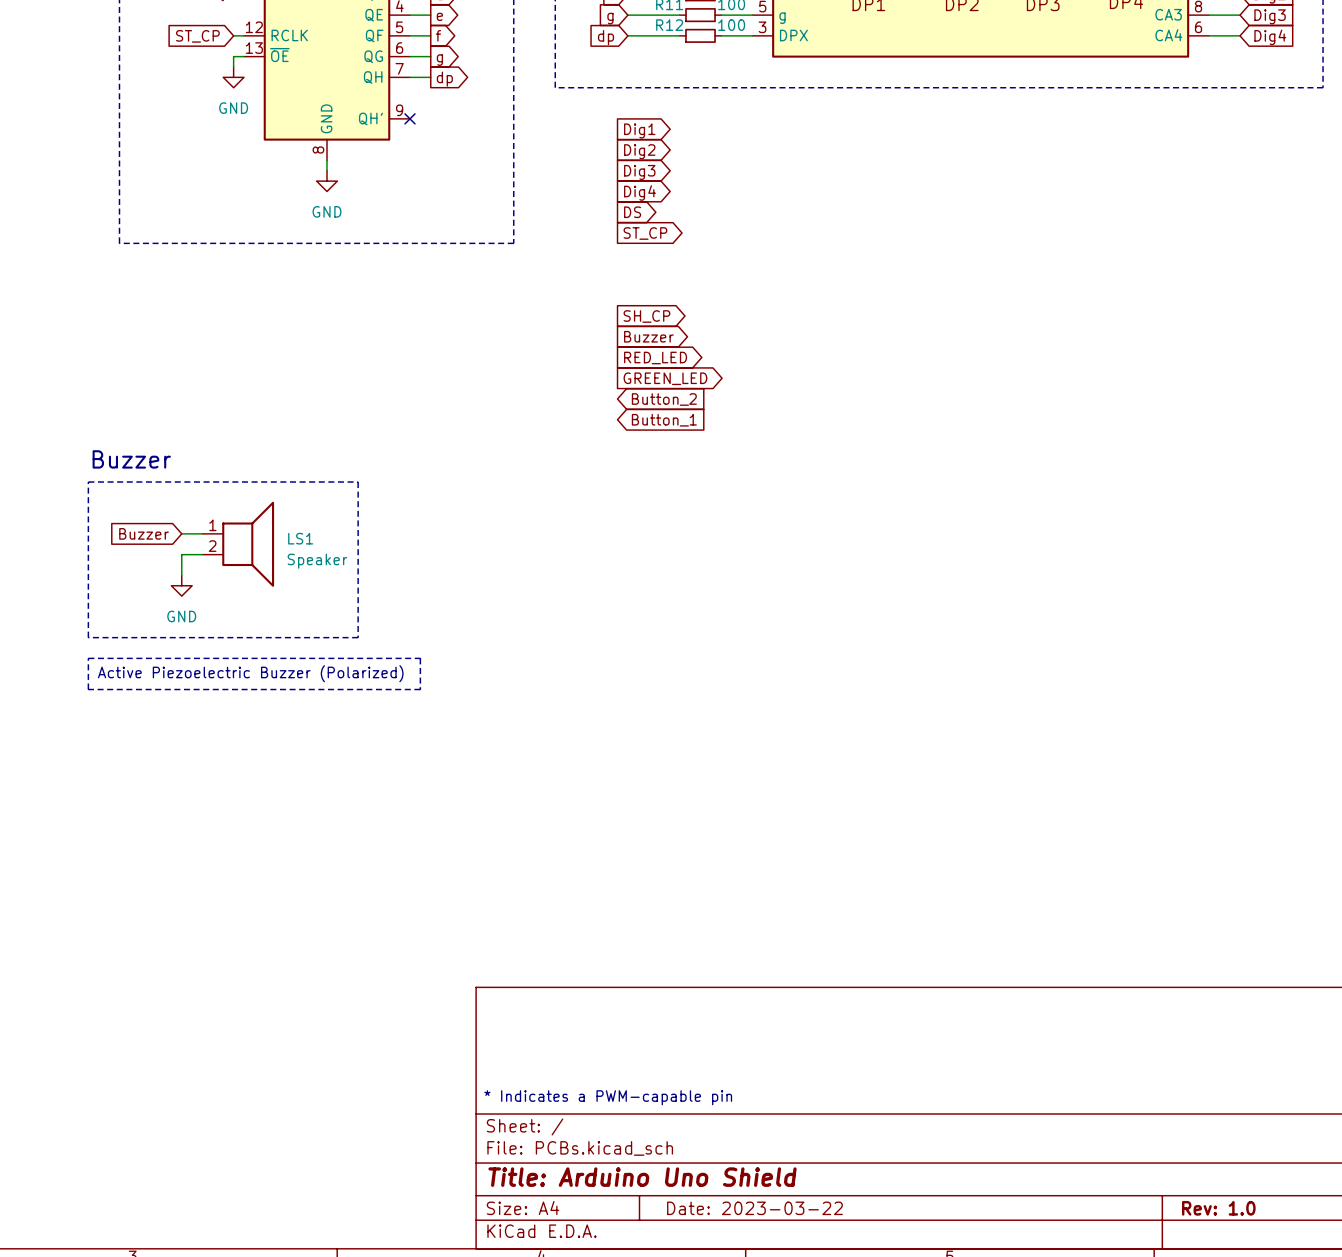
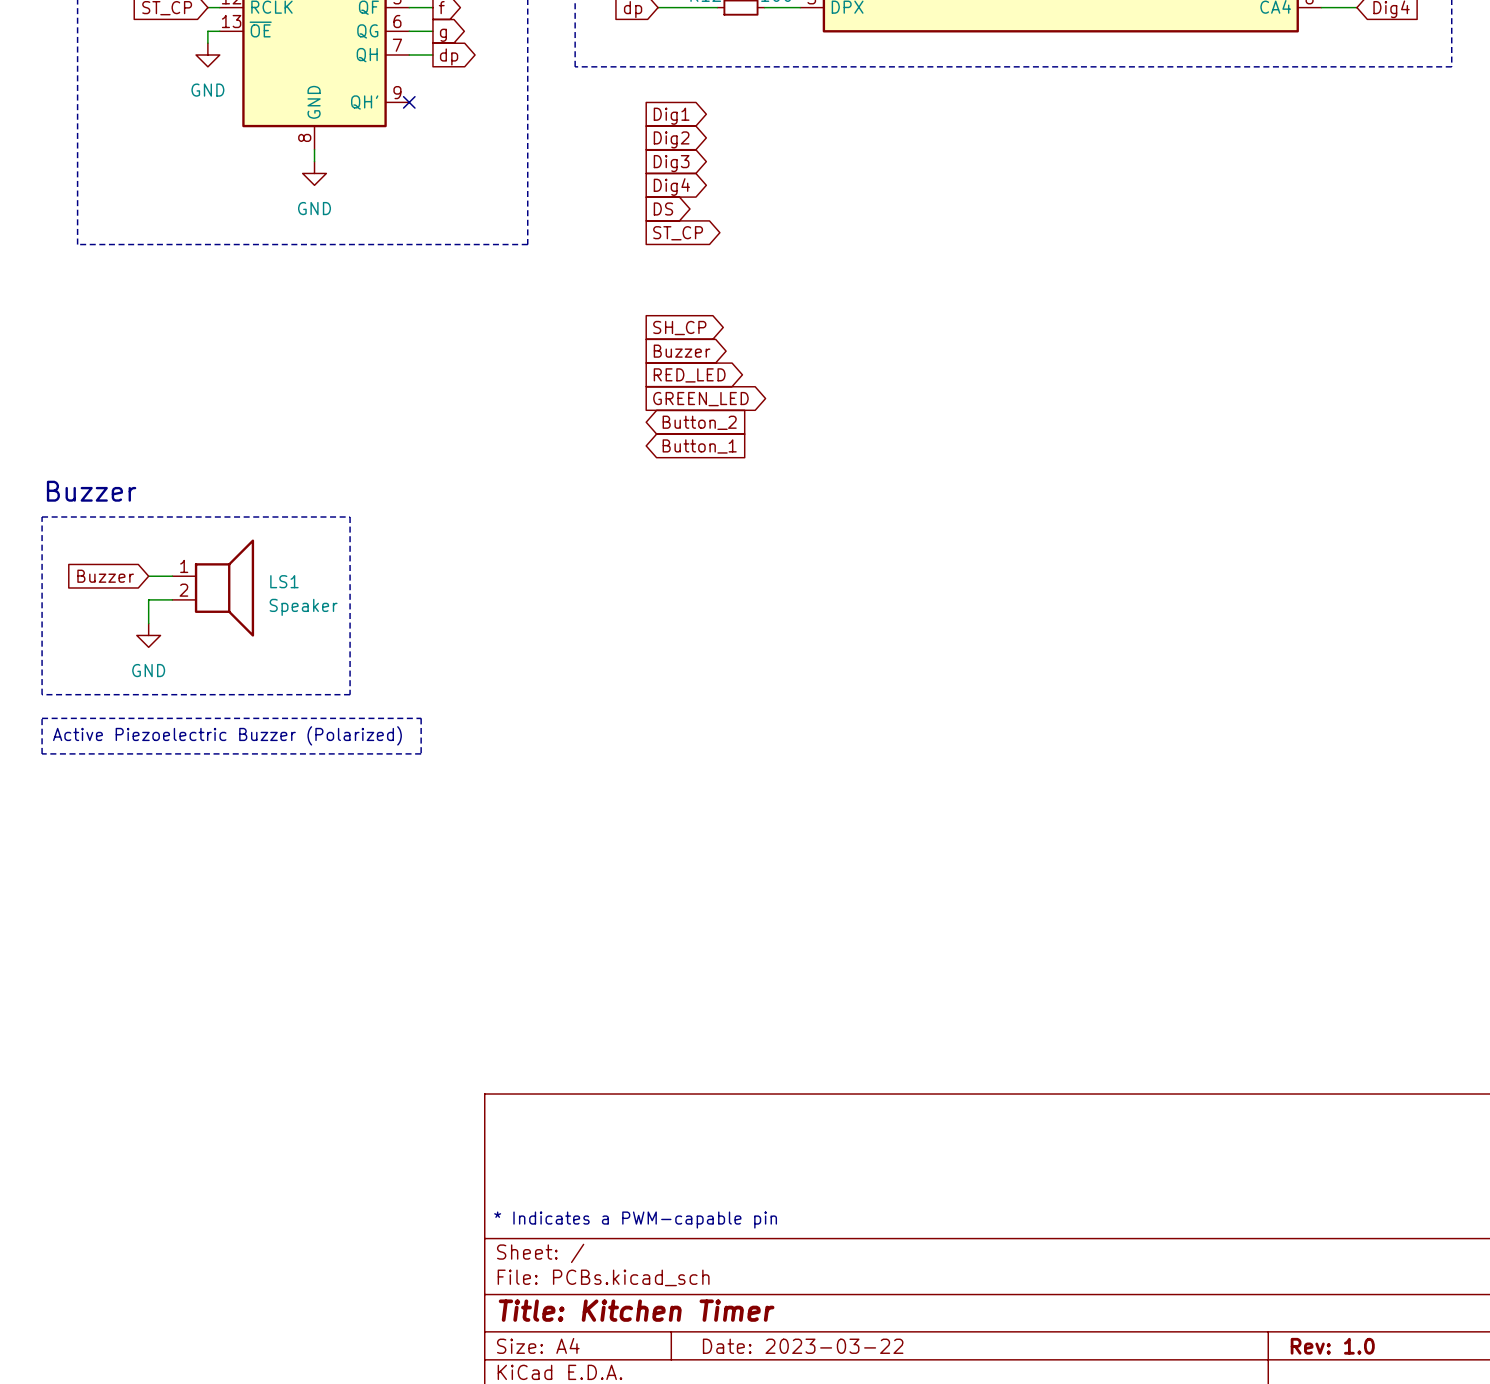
title block: Title: Arduino Uno Shield (642, 1177) -> Title: Kitchen Timer (636, 1310)

